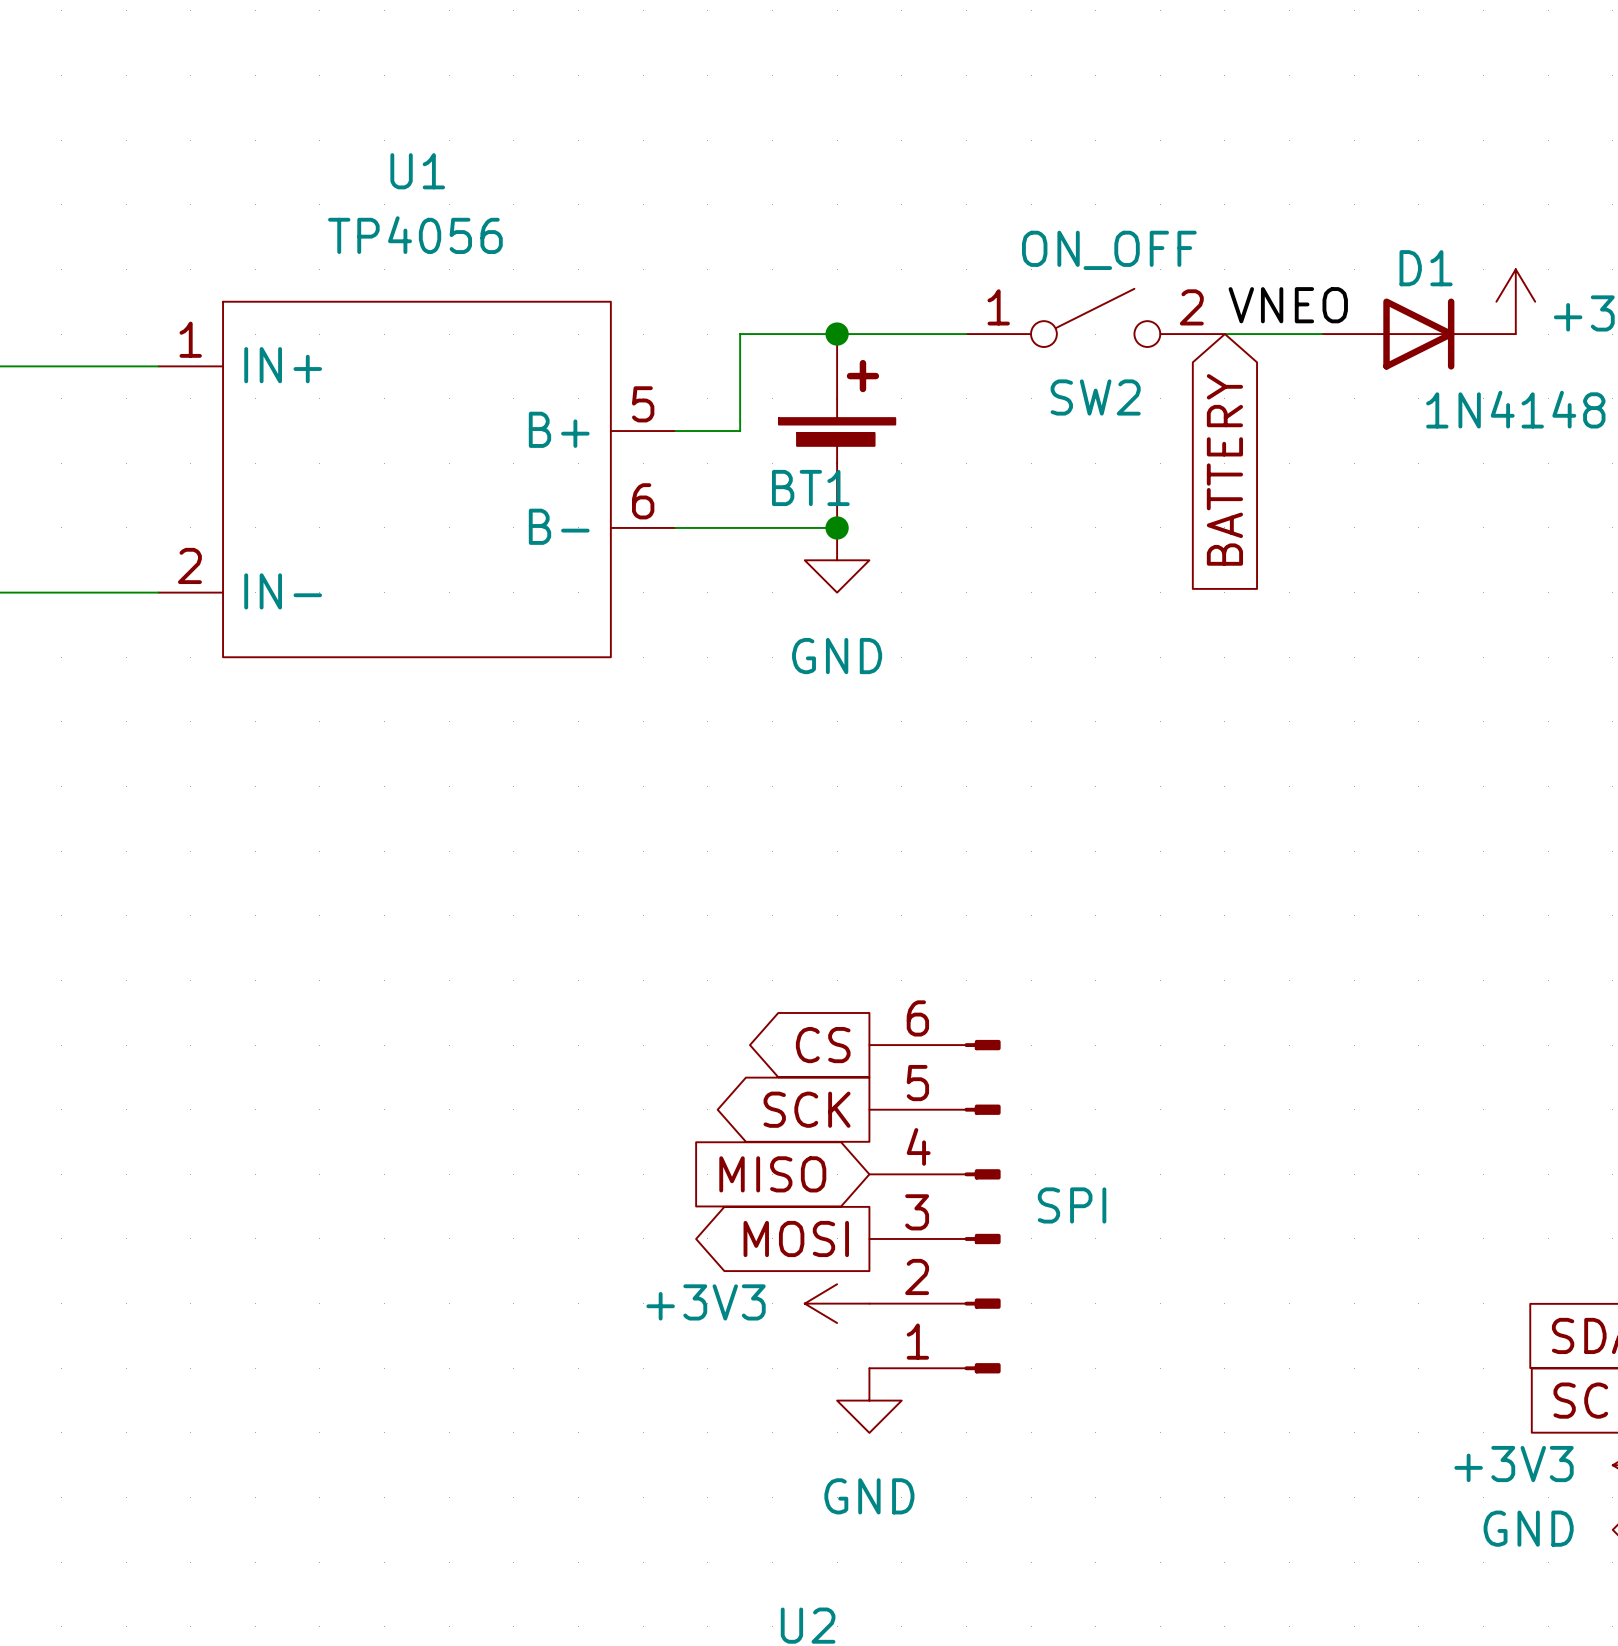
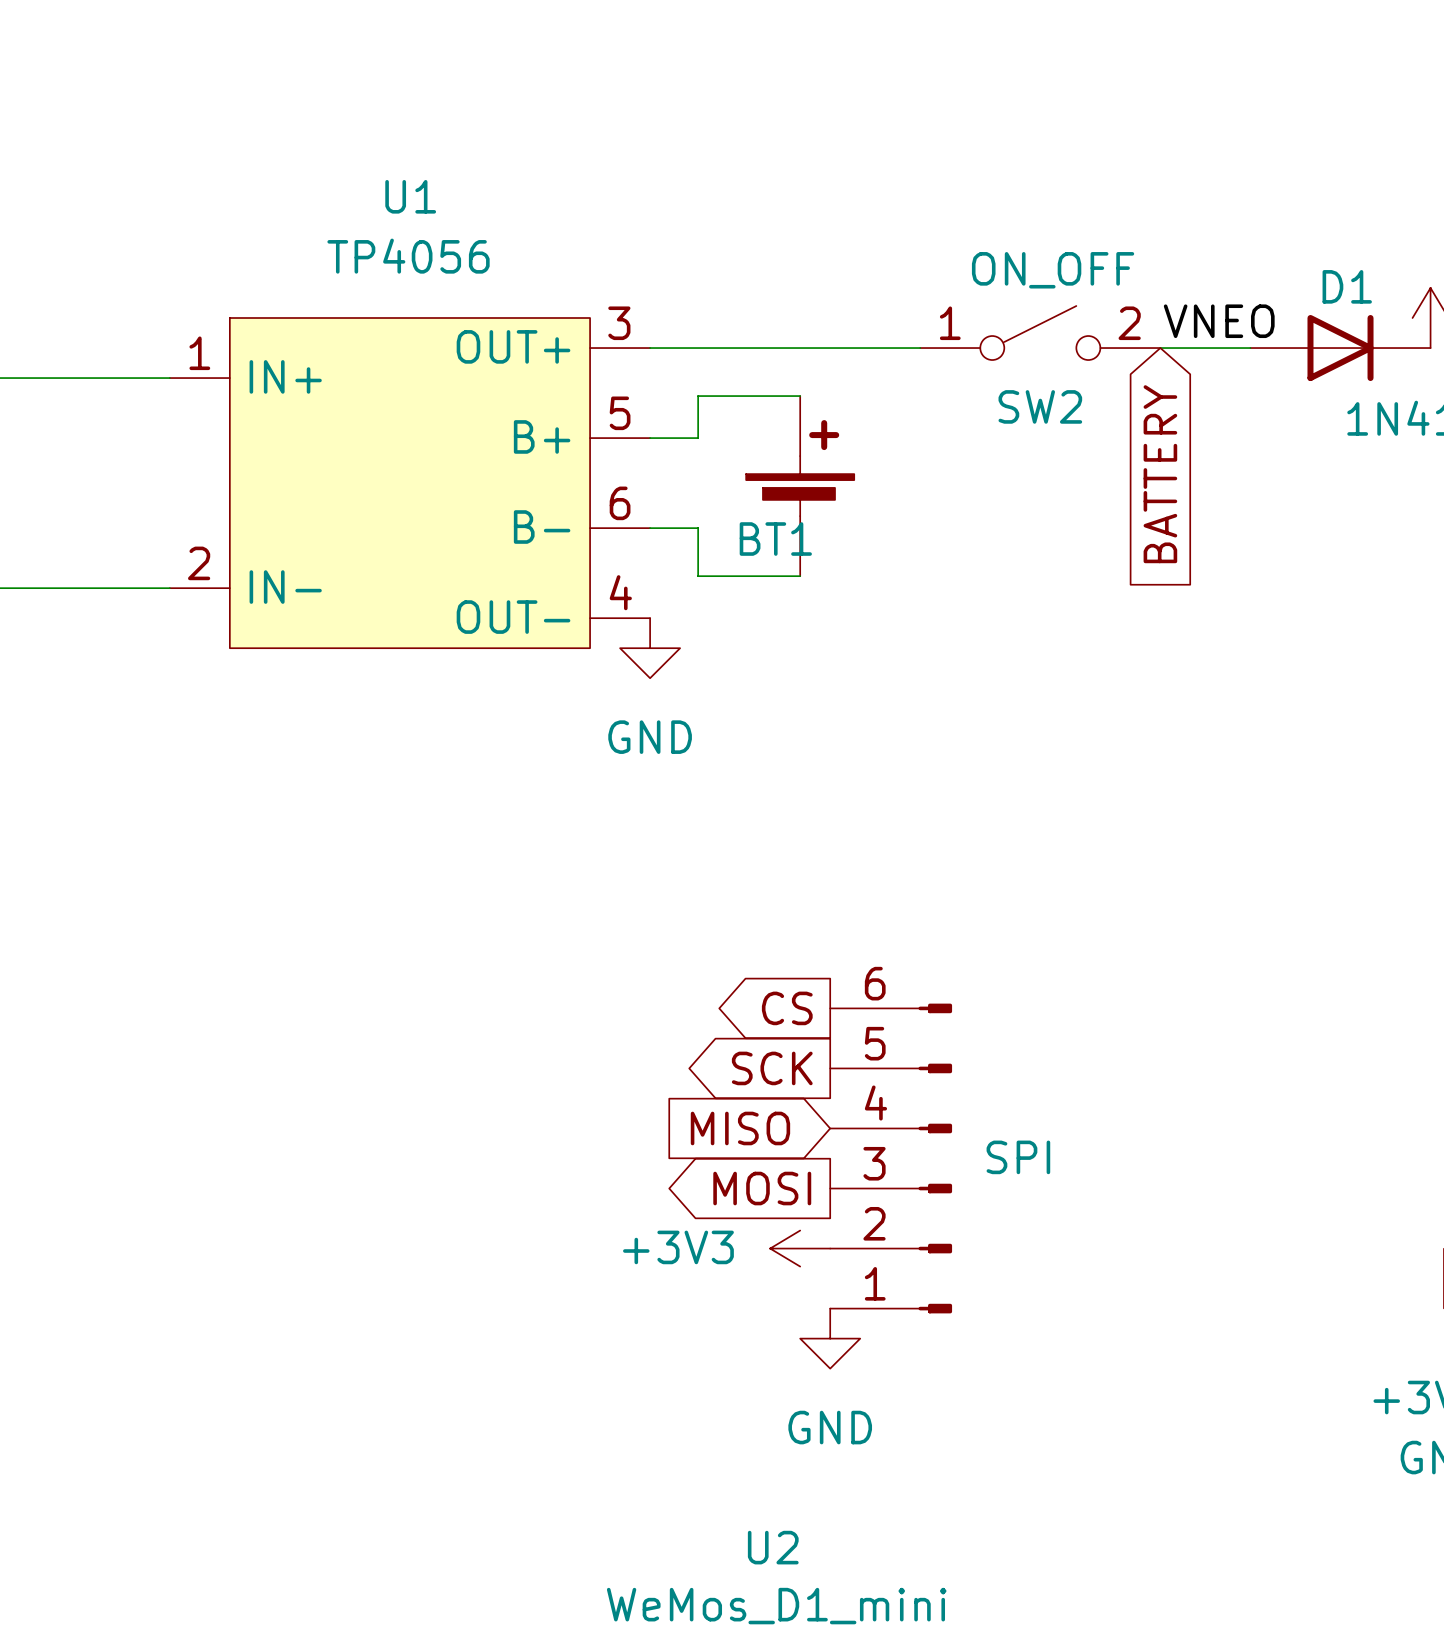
U1 symbol: [158, 301, 676, 658] -> [169, 318, 651, 649]
wire: (740, 334) (740, 431) (727, 431) -> (710, 348) (650, 348)
junction: (837, 334) -> none
wire: none -> (800, 396) (698, 396) (698, 438)
BT1 position: (837, 431) -> (800, 486)
wire: (727, 527) (837, 527) -> (698, 528) (698, 576) (800, 576)
junction: (837, 527) -> none
power symbol position: GND (837, 560) -> GND (650, 648)

